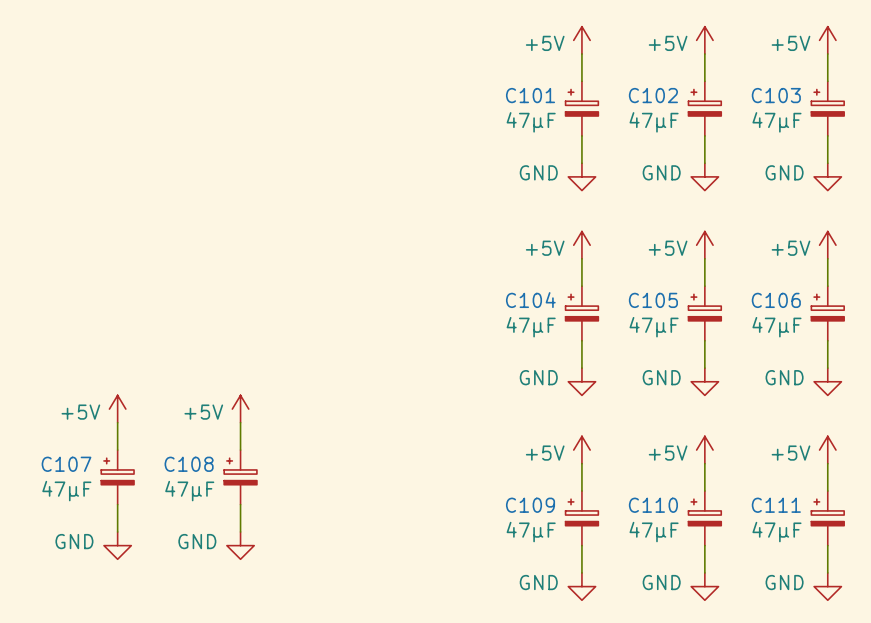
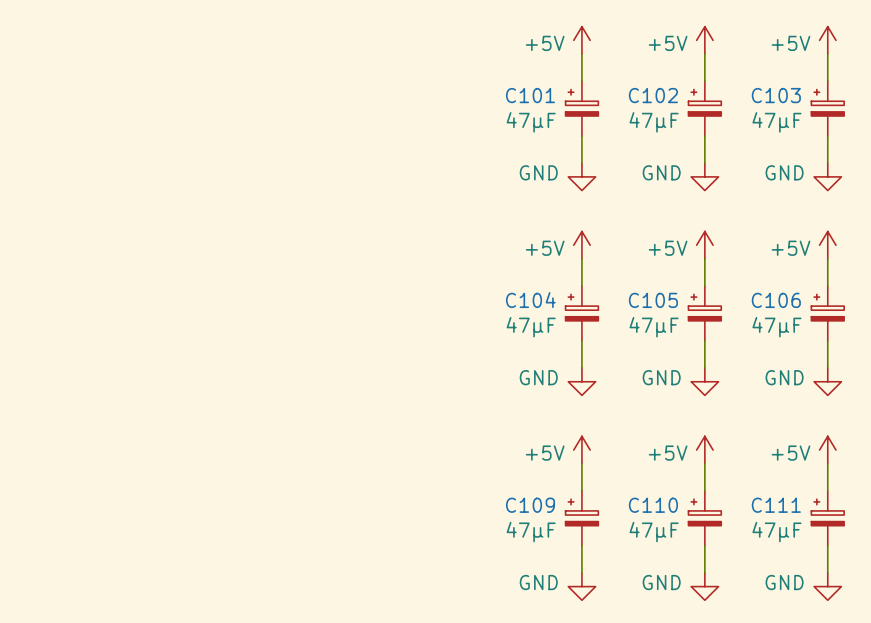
power symbol: +5V (117, 409) -> none
power symbol: +5V (240, 409) -> none
wire: (117, 422) (117, 450) -> none
wire: (240, 422) (240, 450) -> none
C107: 47µF (117, 477) -> none
C108: 47µF (240, 477) -> none
wire: (117, 504) (117, 531) -> none
wire: (240, 504) (240, 531) -> none
power symbol: GND (117, 545) -> none
power symbol: GND (240, 545) -> none

